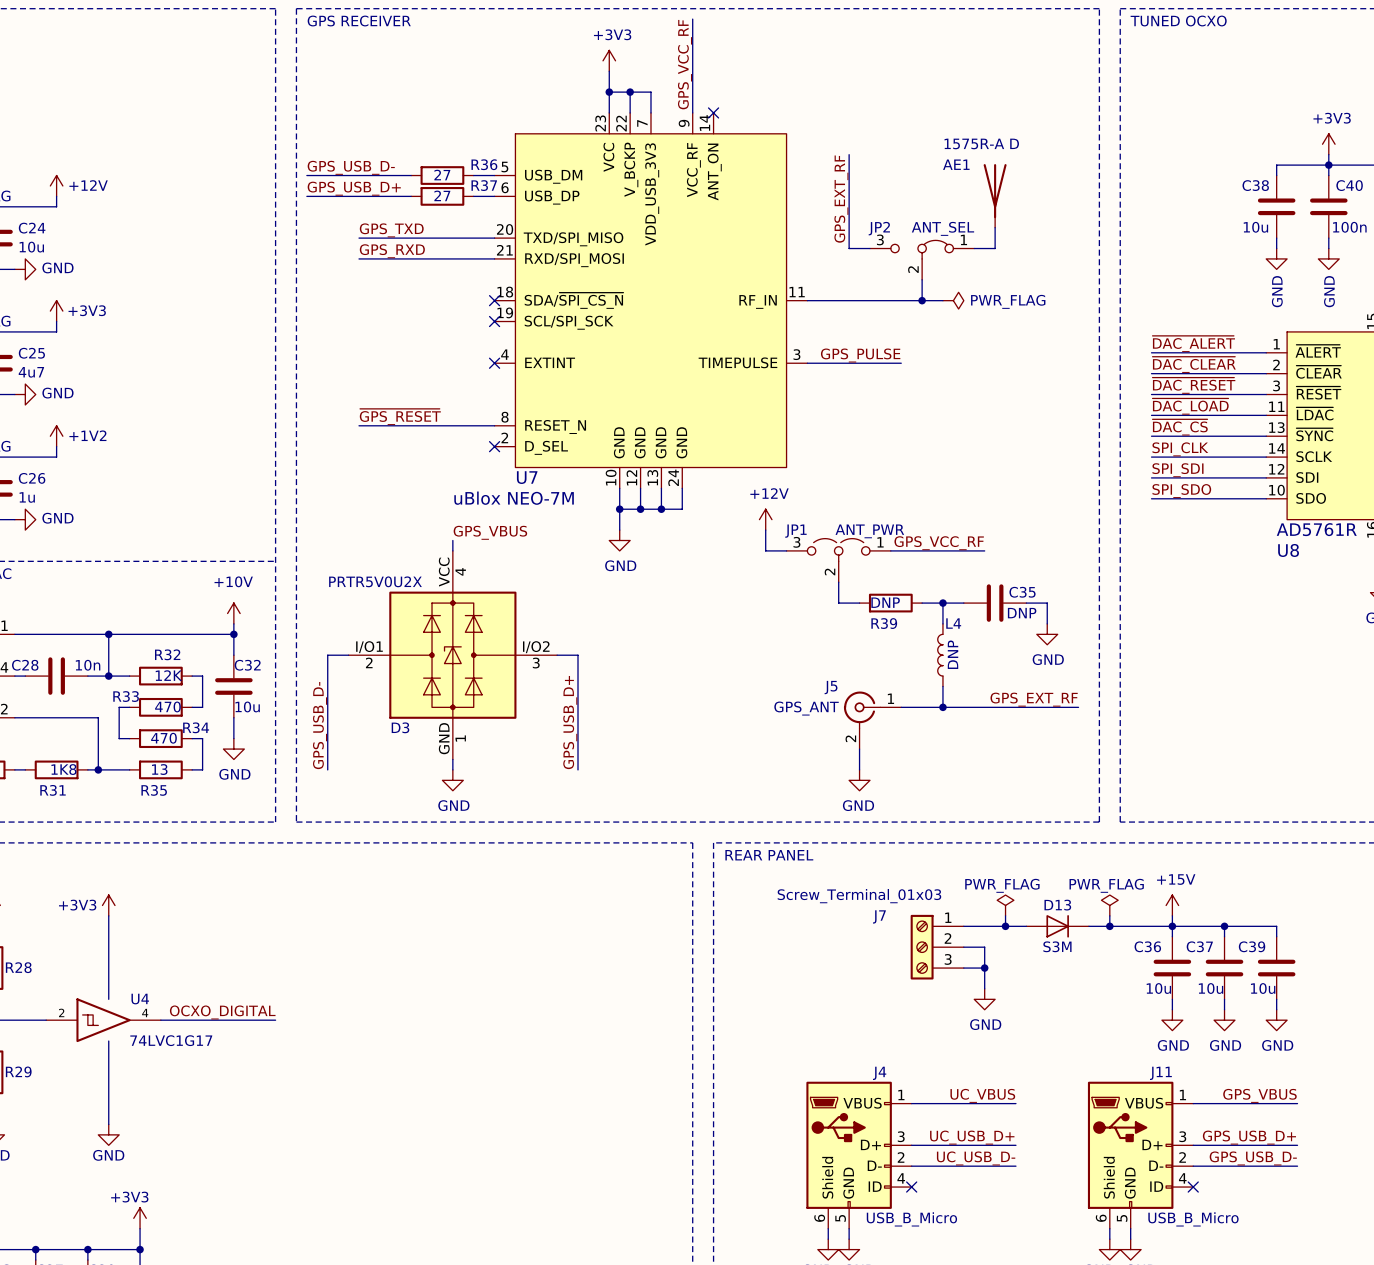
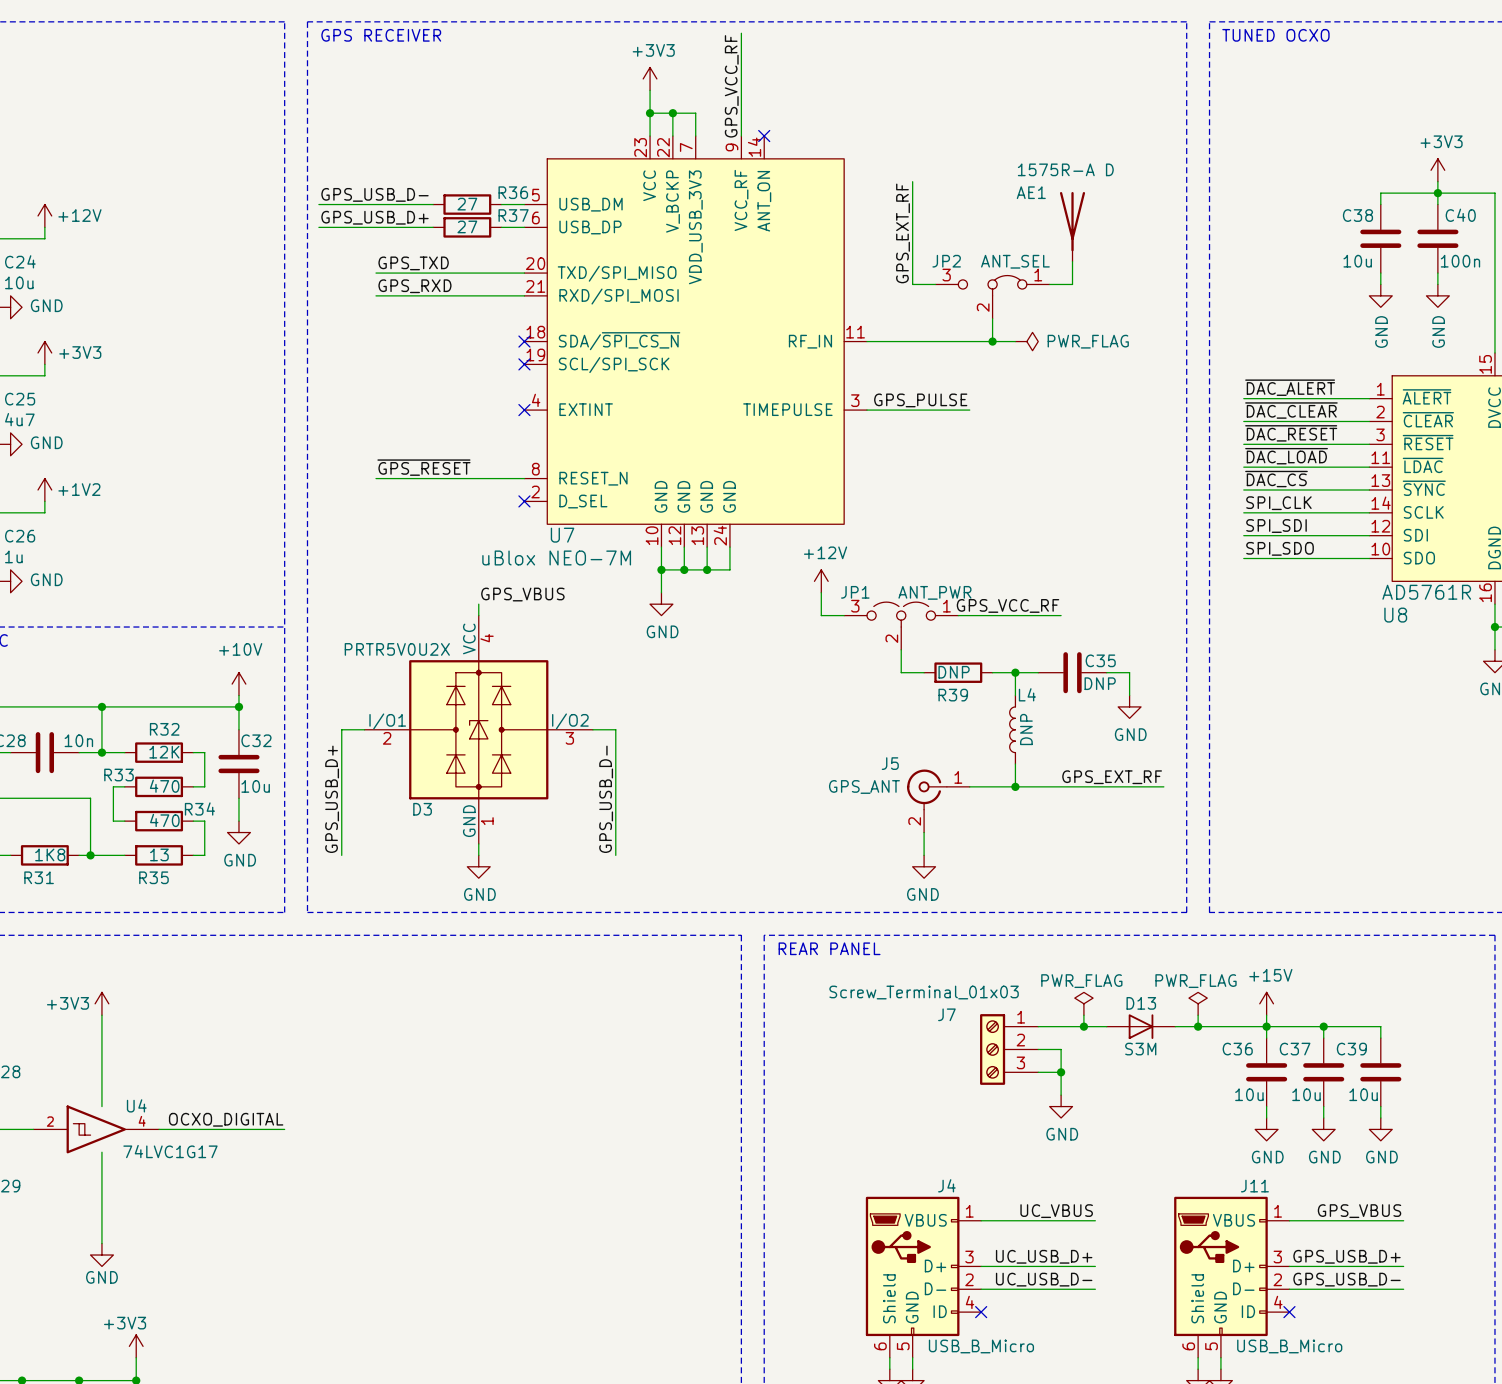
label: GPS_USB_D+ (570, 722) -> GPS_USB_D- (606, 799)
label: GPS_USB_D- (320, 725) -> GPS_USB_D+ (332, 799)

